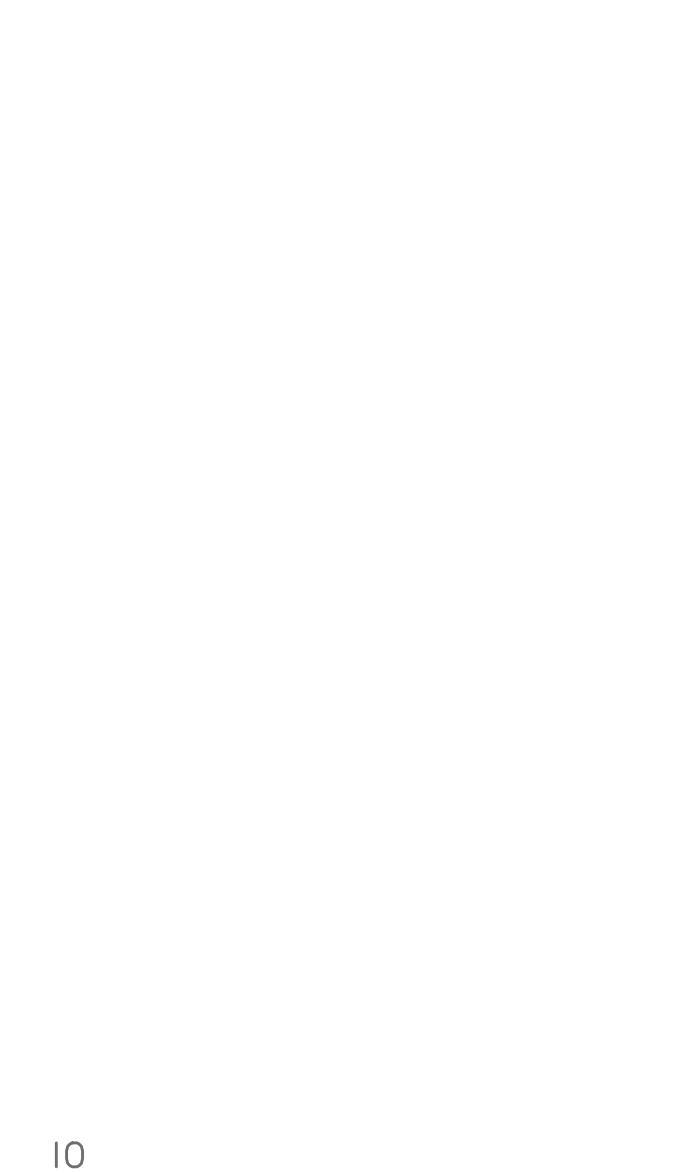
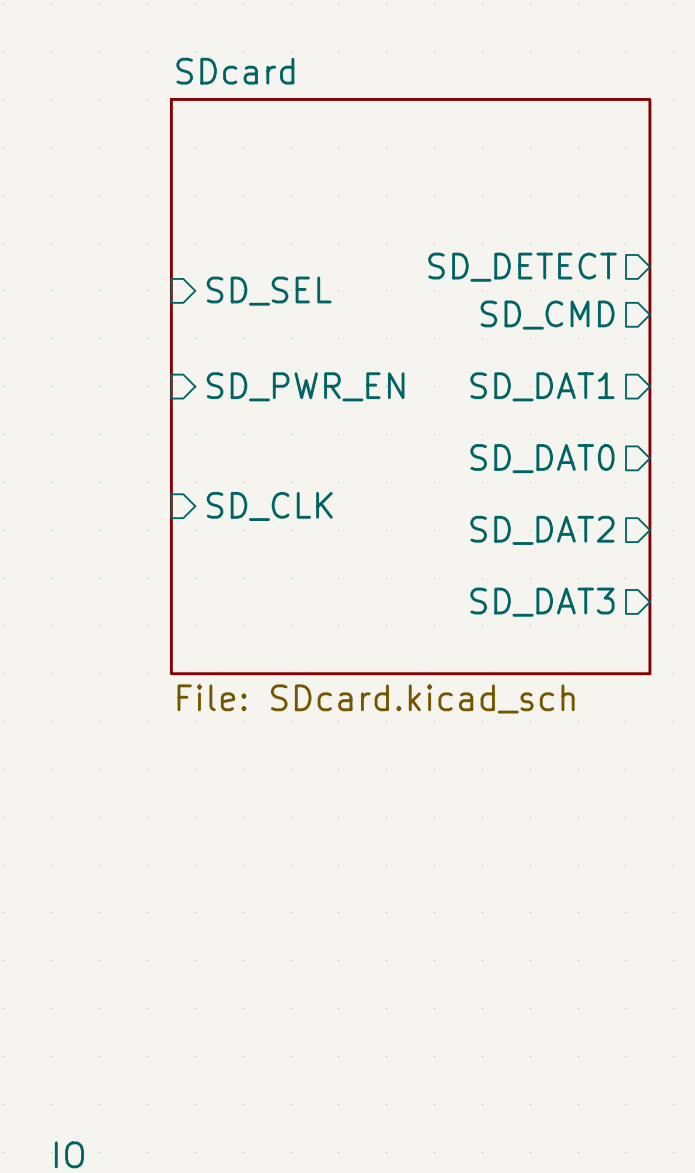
sheet pin: none -> SD_DETECT (522, 267)
sheet pin: none -> SD_SEL (269, 291)
sheet pin: none -> SD_CMD (547, 315)
sheet pin: none -> SD_PWR_EN (305, 386)
sheet SDcard: none -> File: SDcard.kicad_sch (410, 386)
sheet pin: none -> SD_DAT1 (542, 386)
sheet pin: none -> SD_DAT0 (542, 458)
sheet pin: none -> SD_CLK (269, 506)
sheet pin: none -> SD_DAT2 (542, 530)
sheet pin: none -> SD_DAT3 (542, 602)

